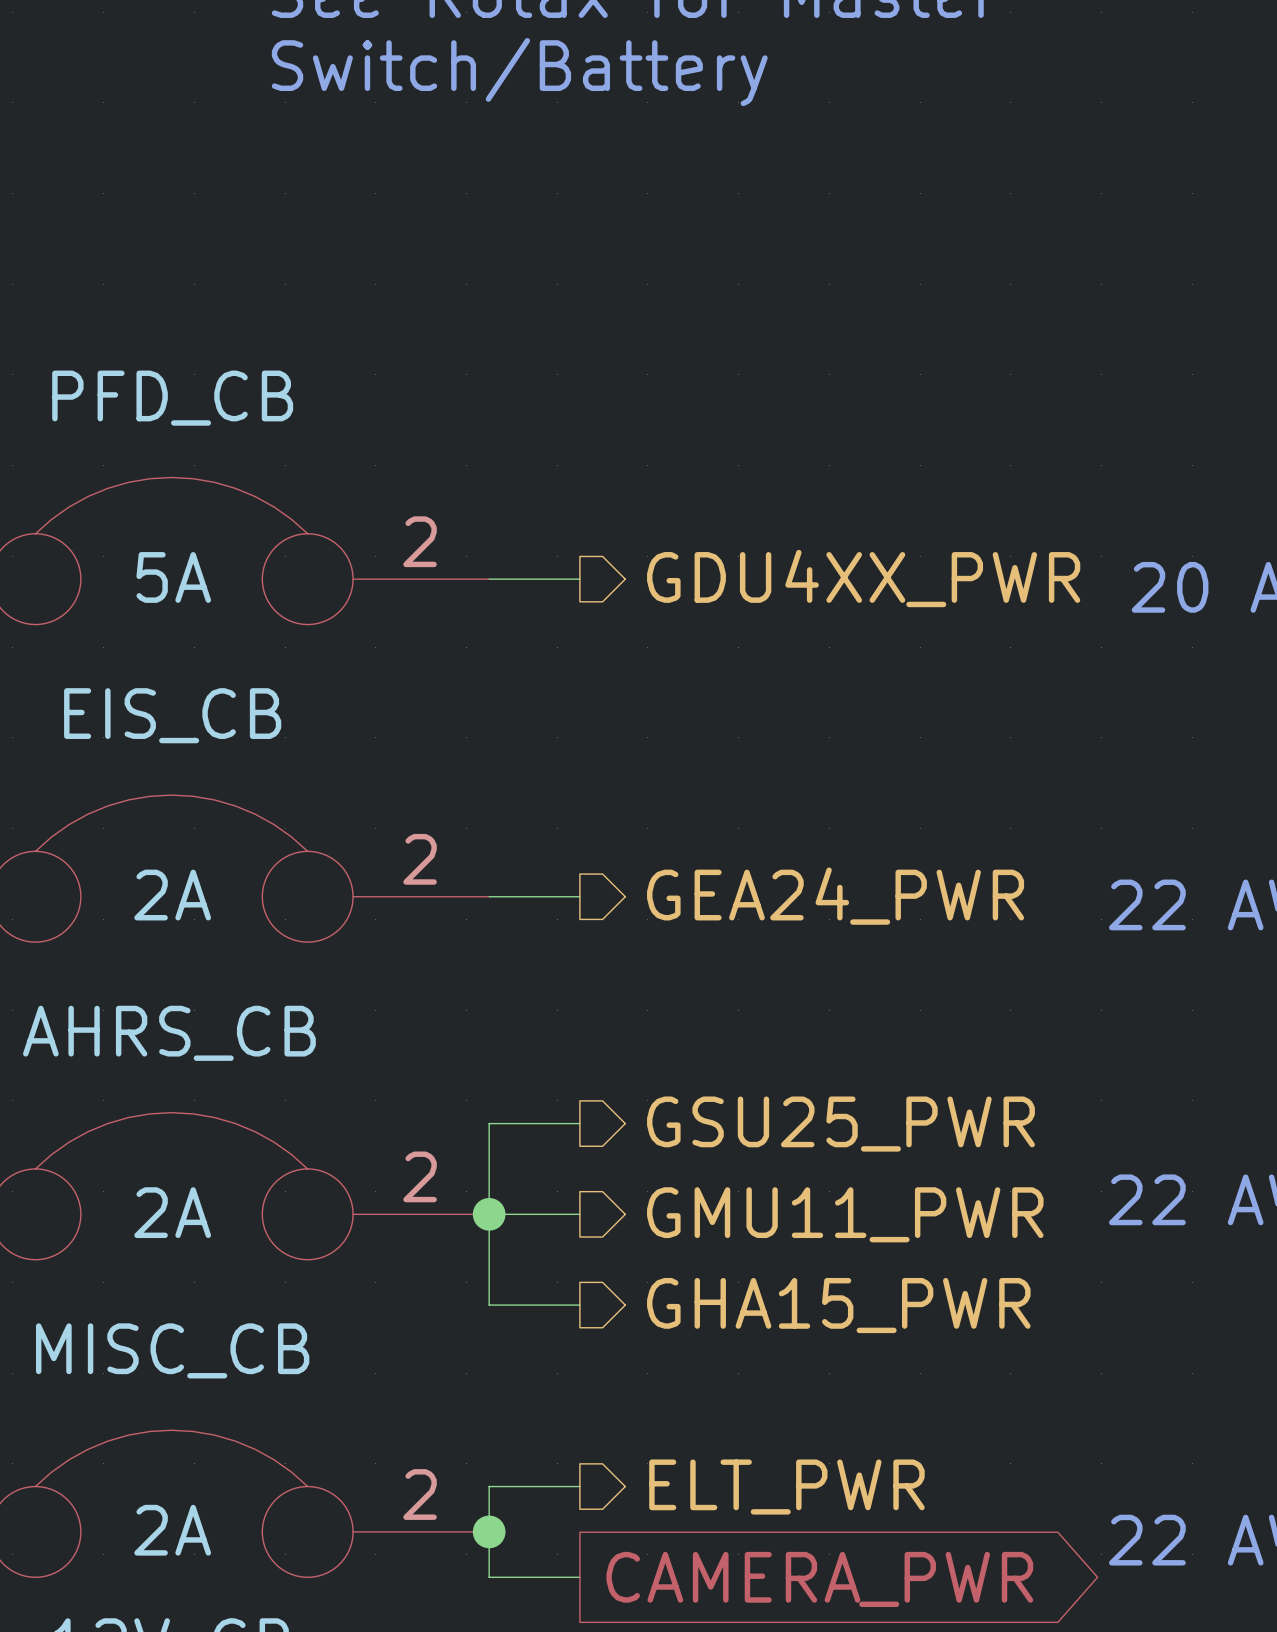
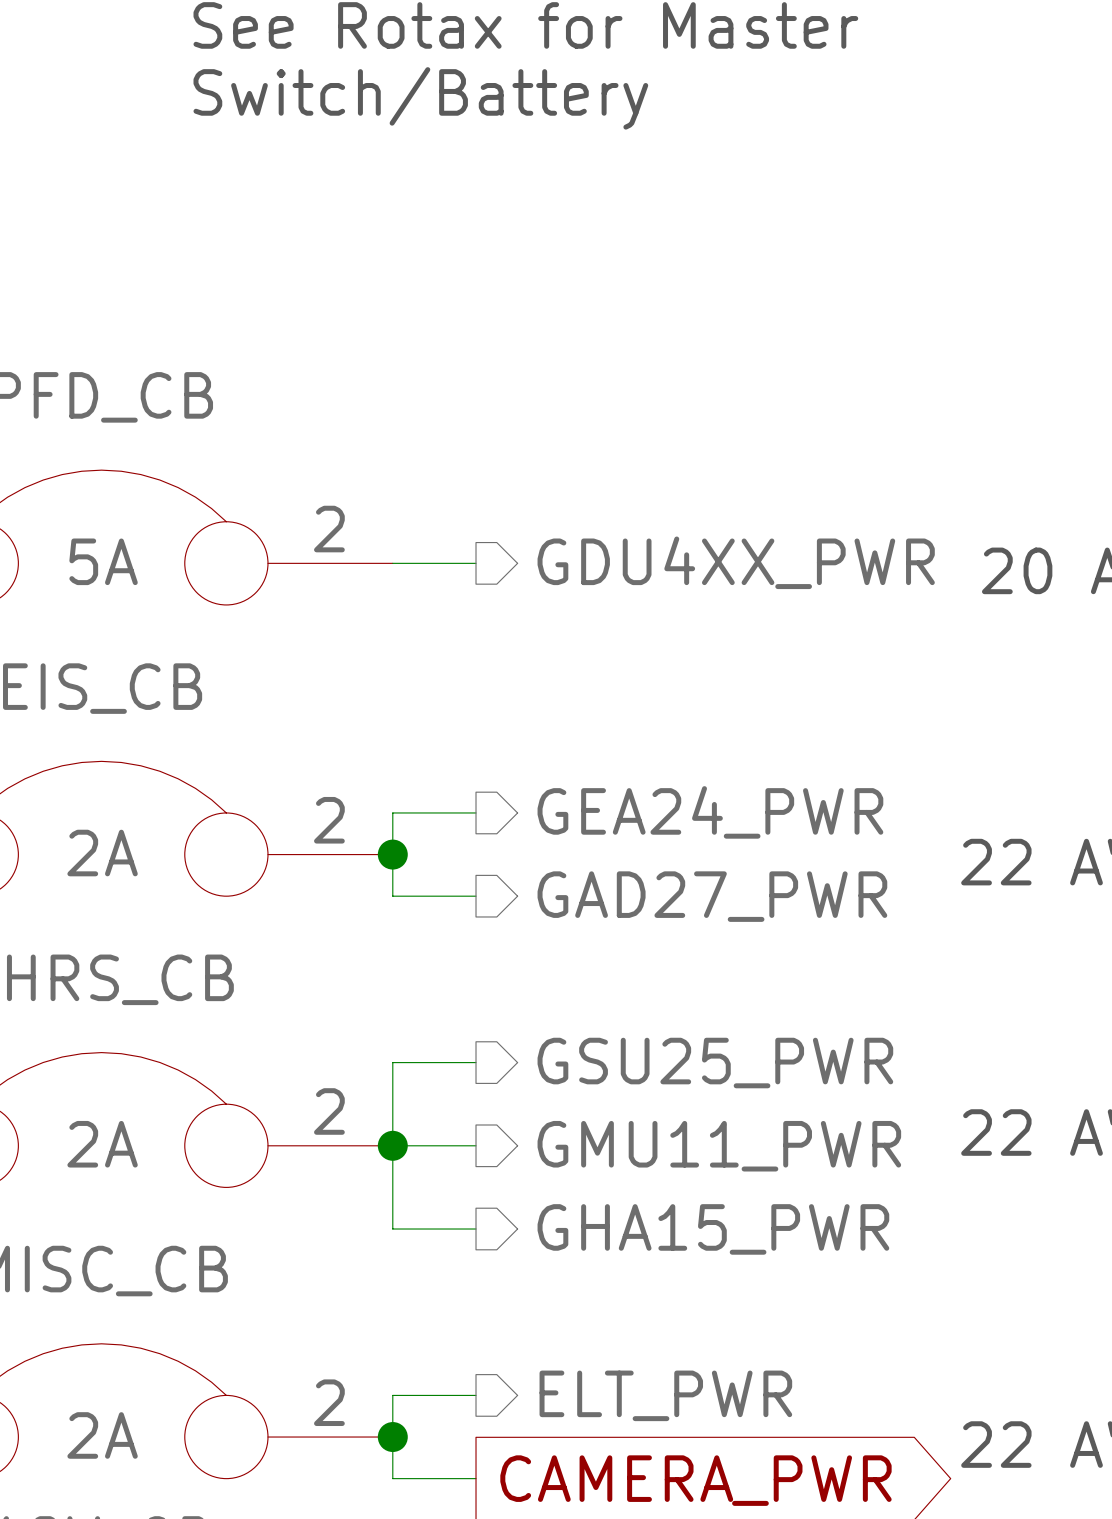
wire: none -> (476, 812) (392, 812) (392, 896) (476, 896)
wire: (489, 896) (579, 896) -> none
junction: none -> (392, 854)
hierarchical label position: GEA24_PWR (835, 896) -> GEA24_PWR (710, 812)
hierarchical label: none -> GAD27_PWR (712, 896)

